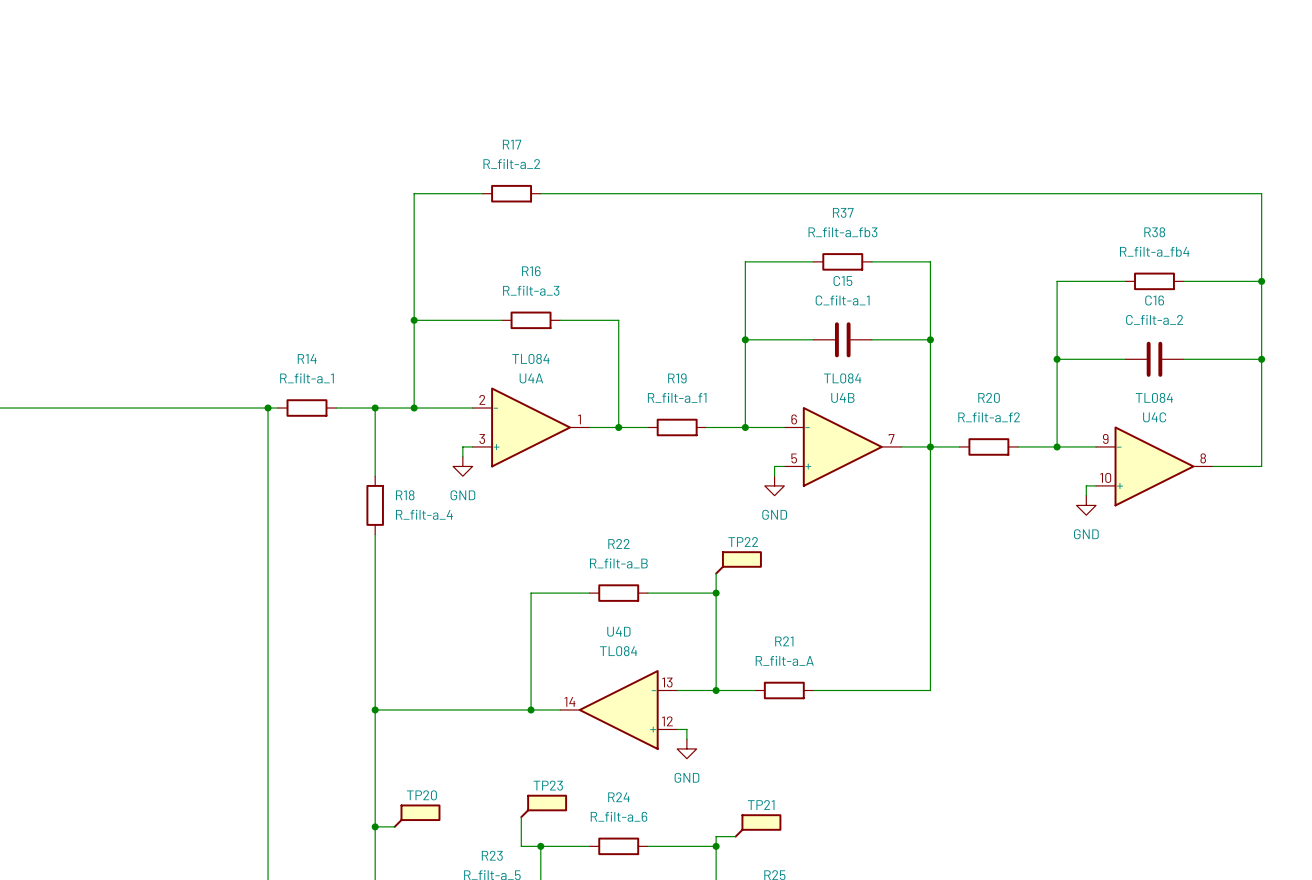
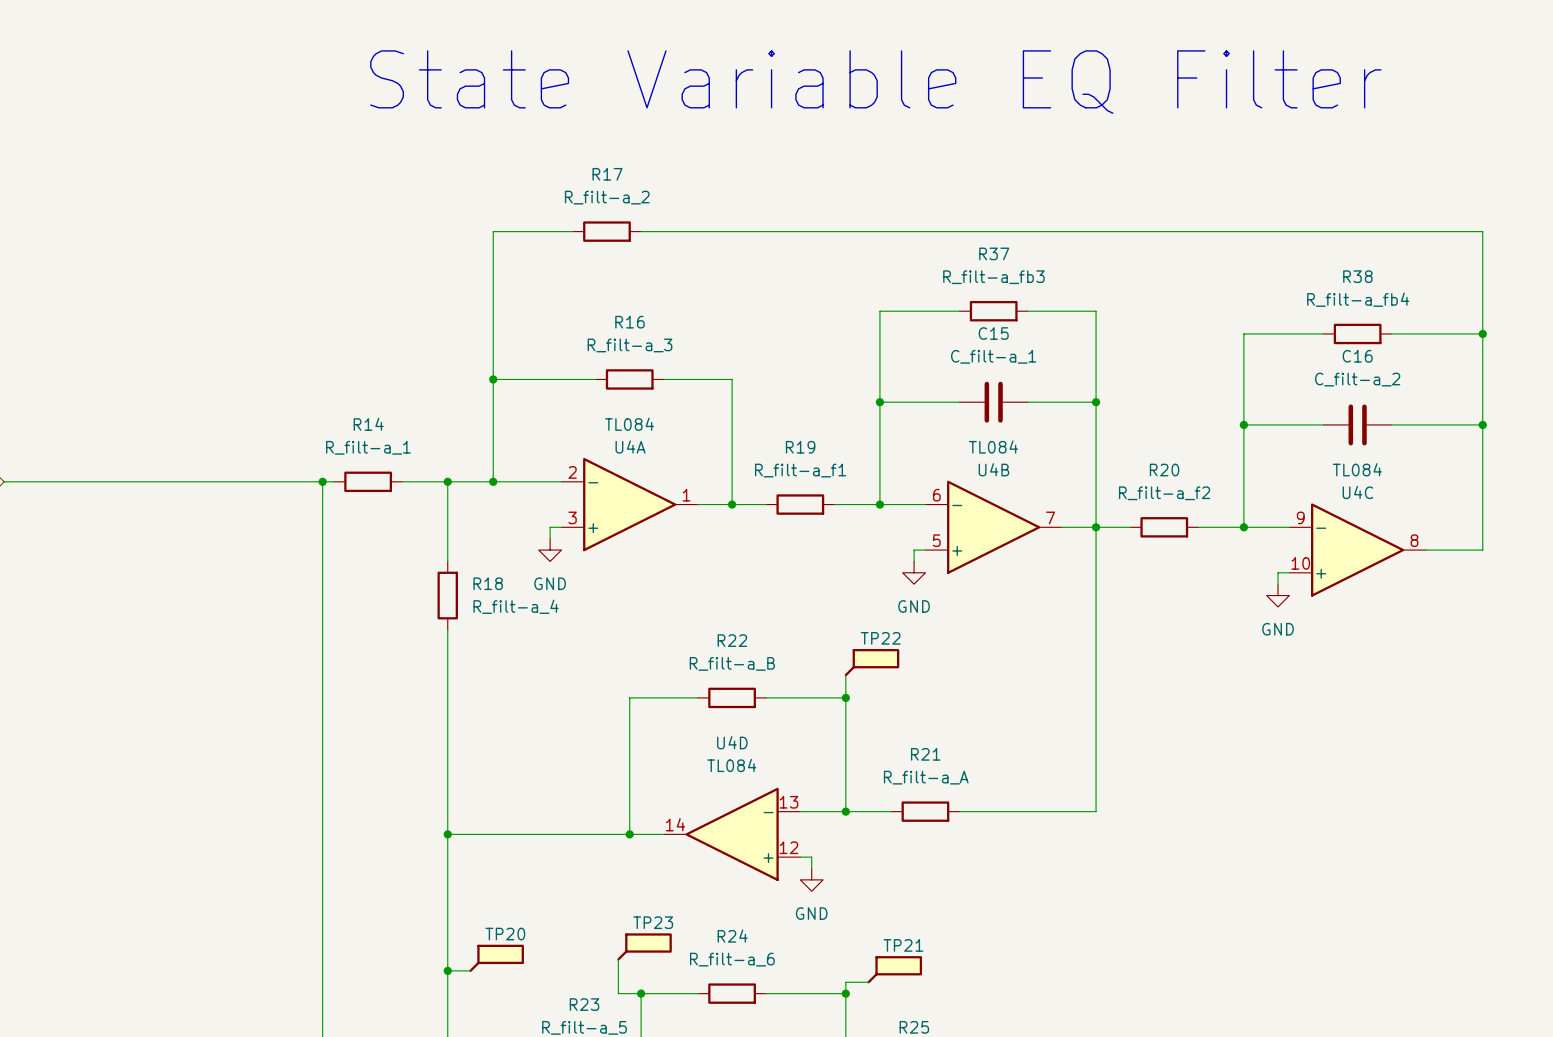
text: none -> State Variable EQ Filter (875, 82)

